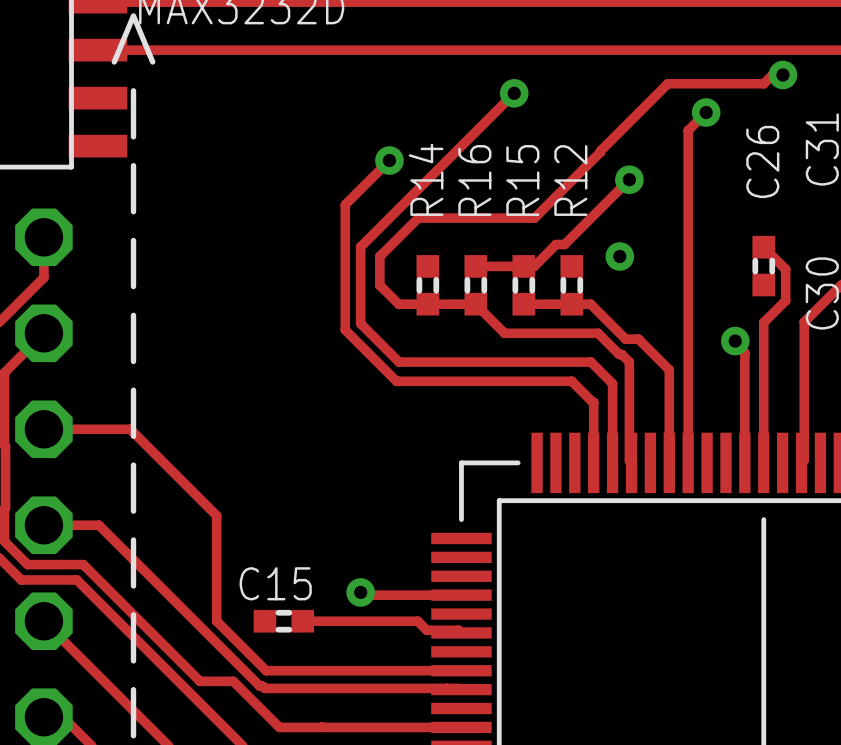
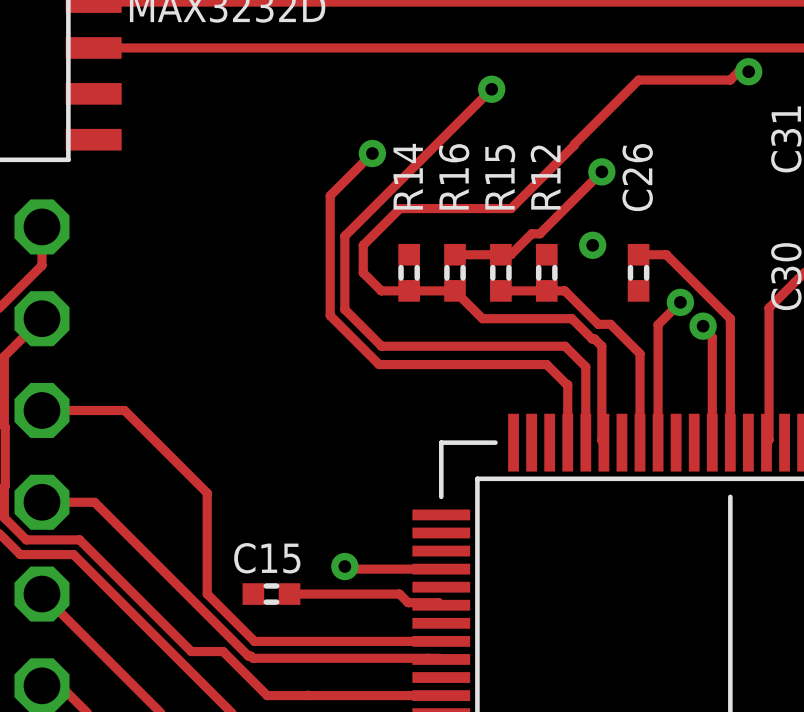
track: (706, 112) (688, 130) (688, 339) -> (680, 302) (658, 324)
via: (706, 112) -> none
track: (763, 247) (785, 269) (785, 300) (763, 322) (763, 333) -> (638, 254) (666, 254) (730, 318)
C26 position: (763, 266) -> (638, 272)
via: none -> (680, 302)

